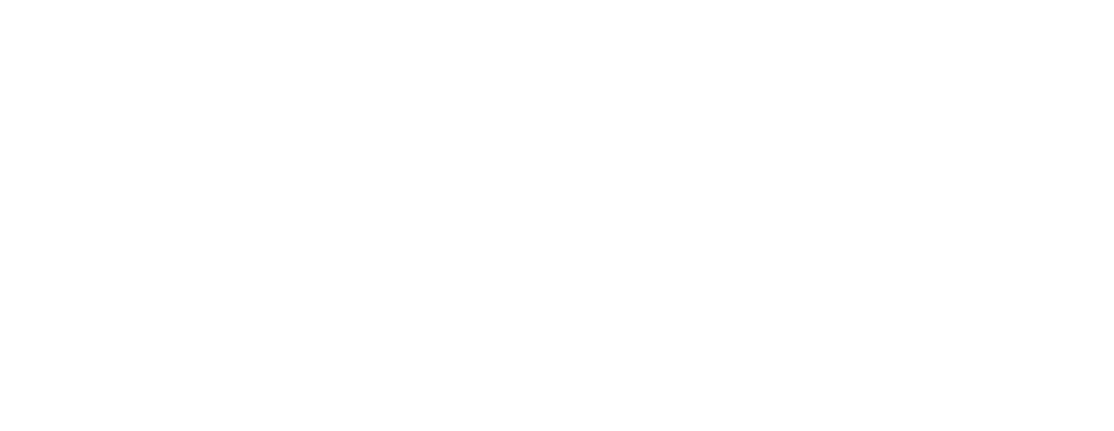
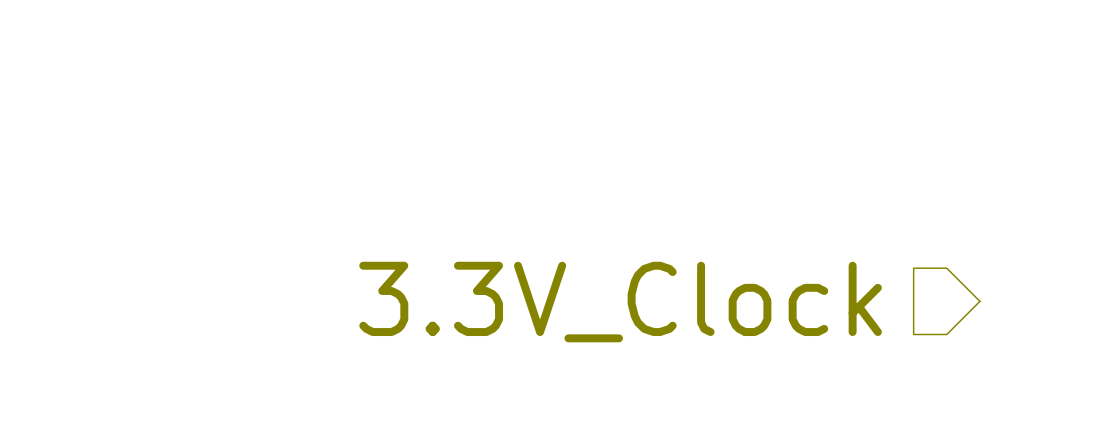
hierarchical label: none -> 3.3V_Clock (620, 302)

